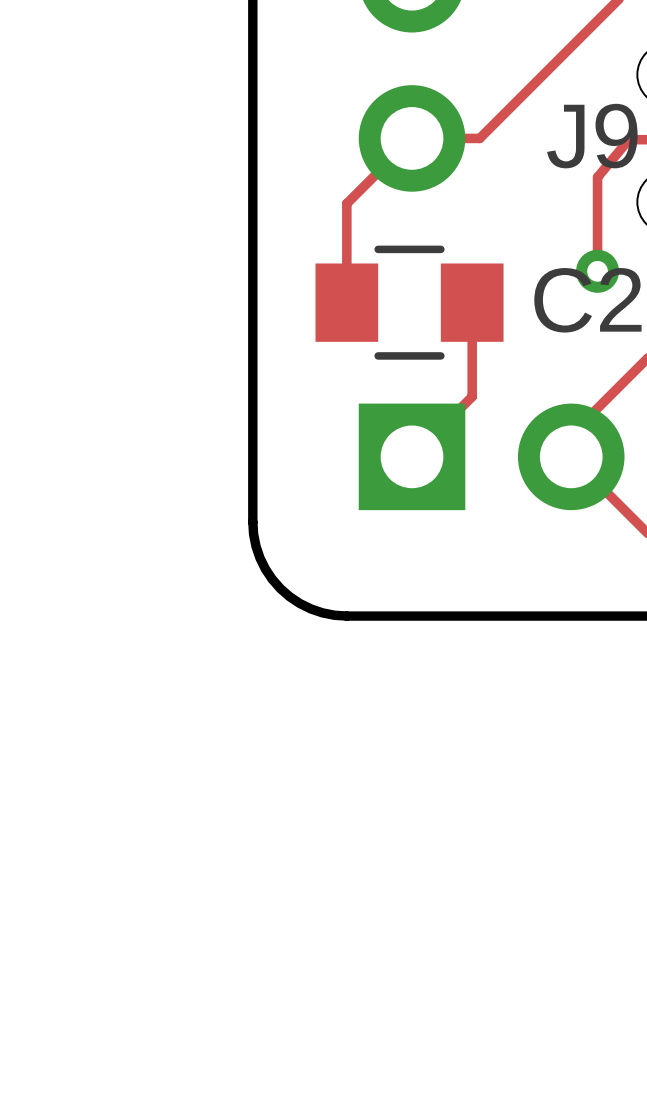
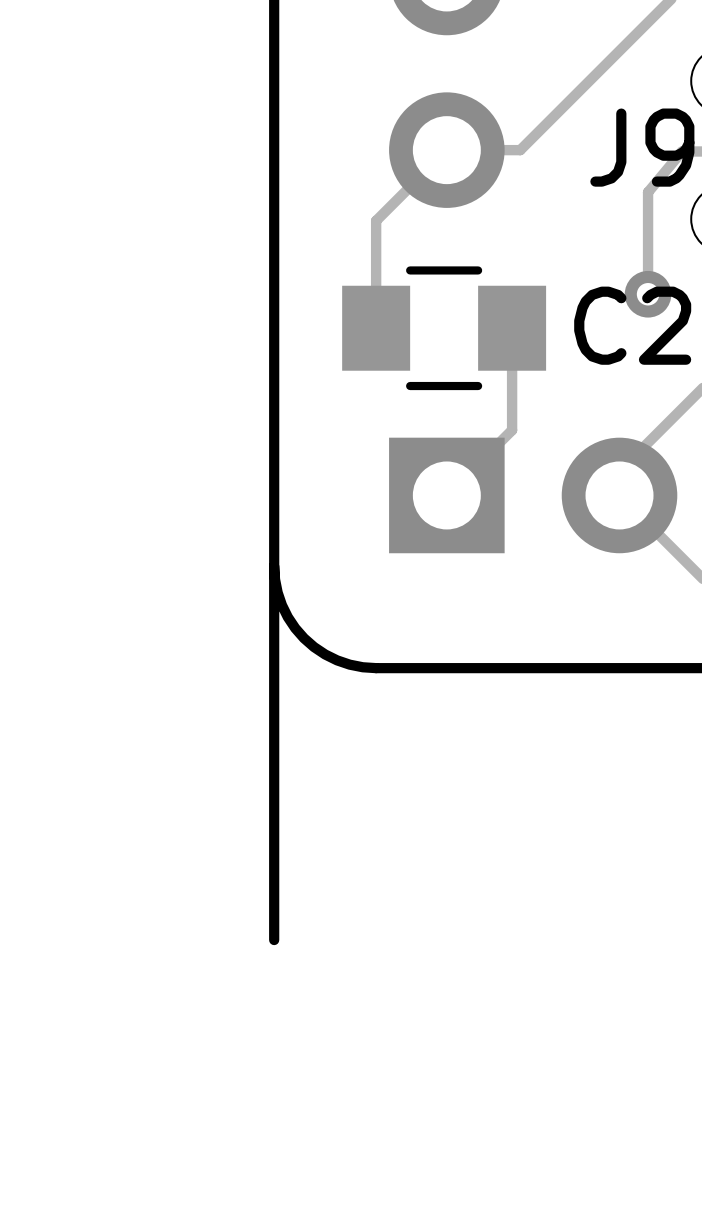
board edge: none -> (274, 566) (274, 940)

